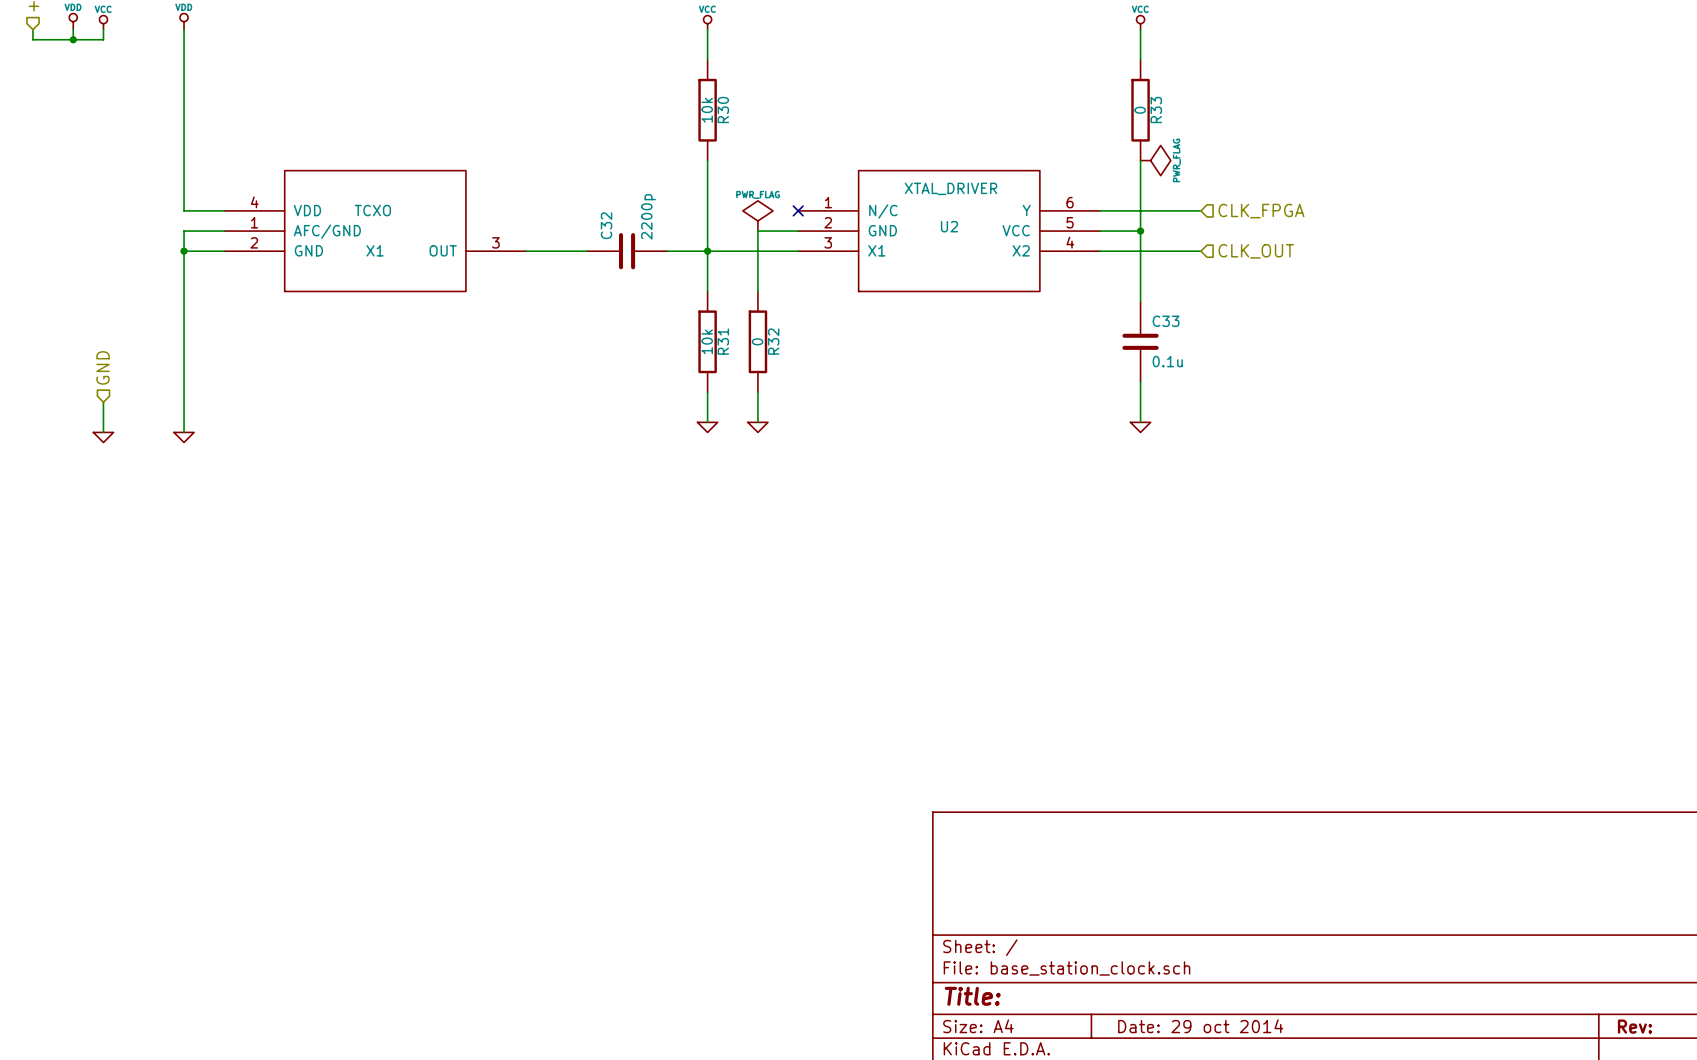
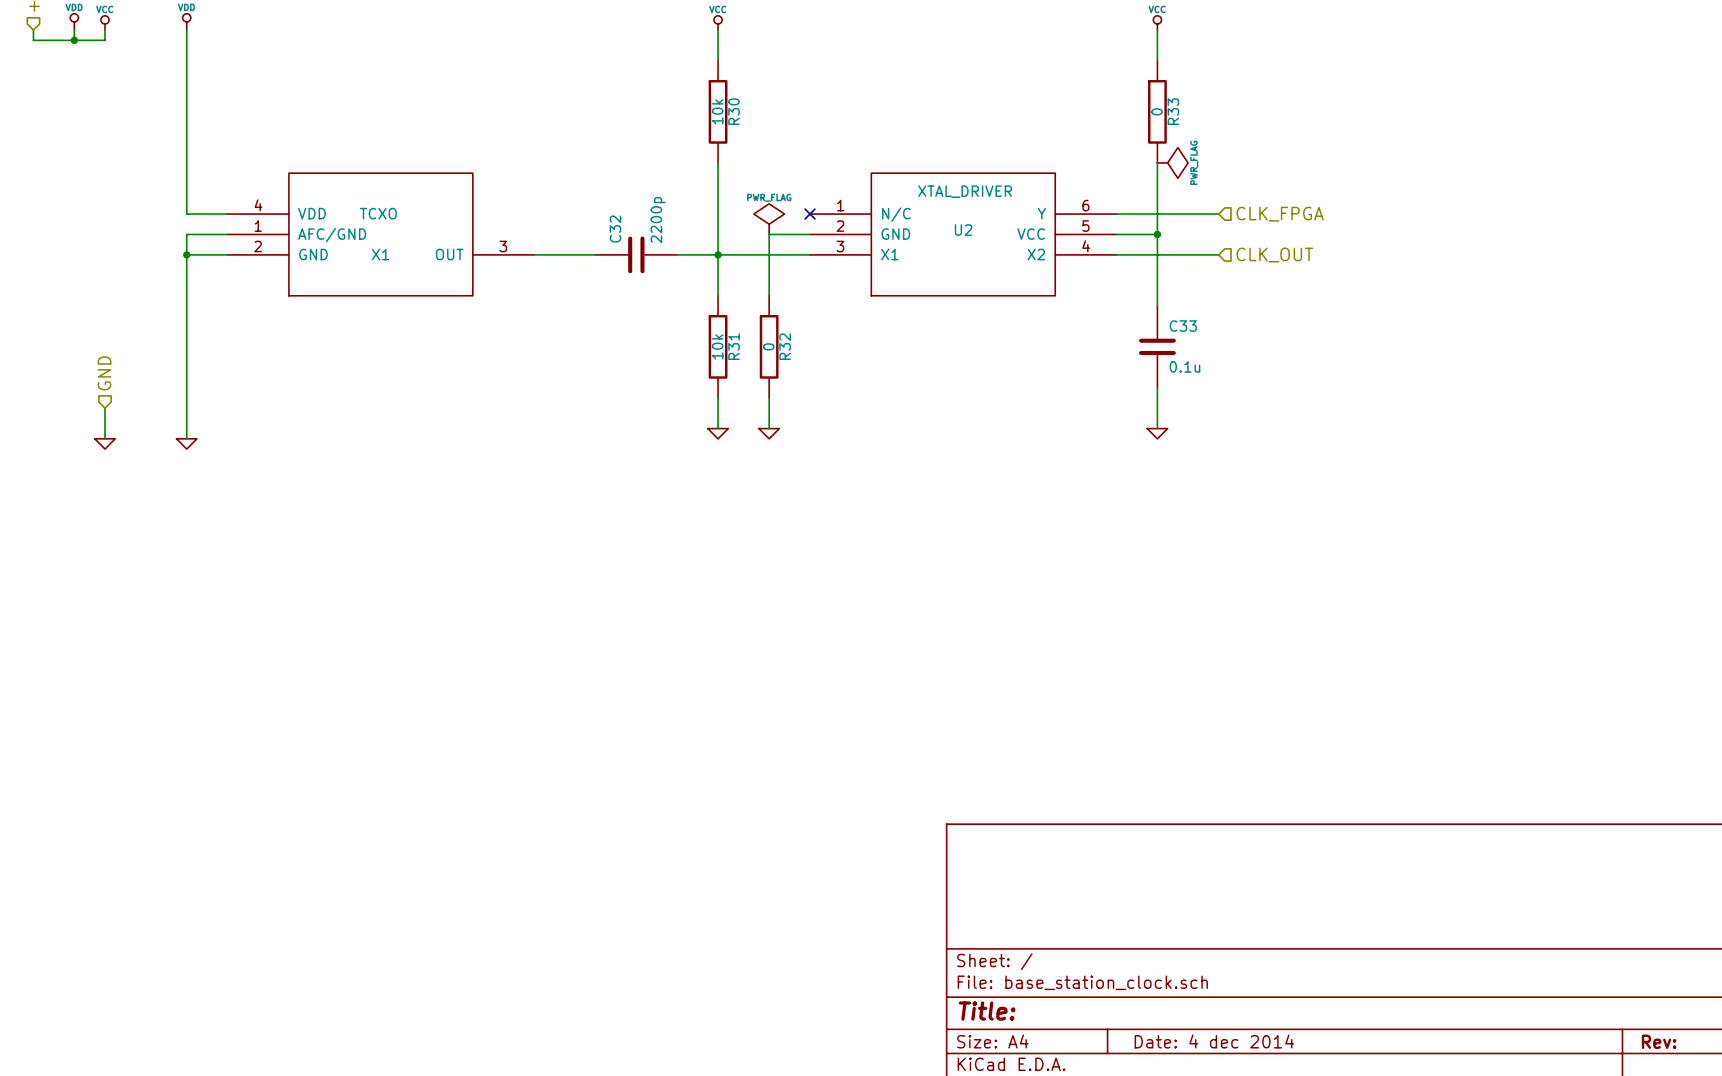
title block: Date: 29 oct 2014 (1200, 1026) -> Date: 4 dec 2014 (1214, 1041)

